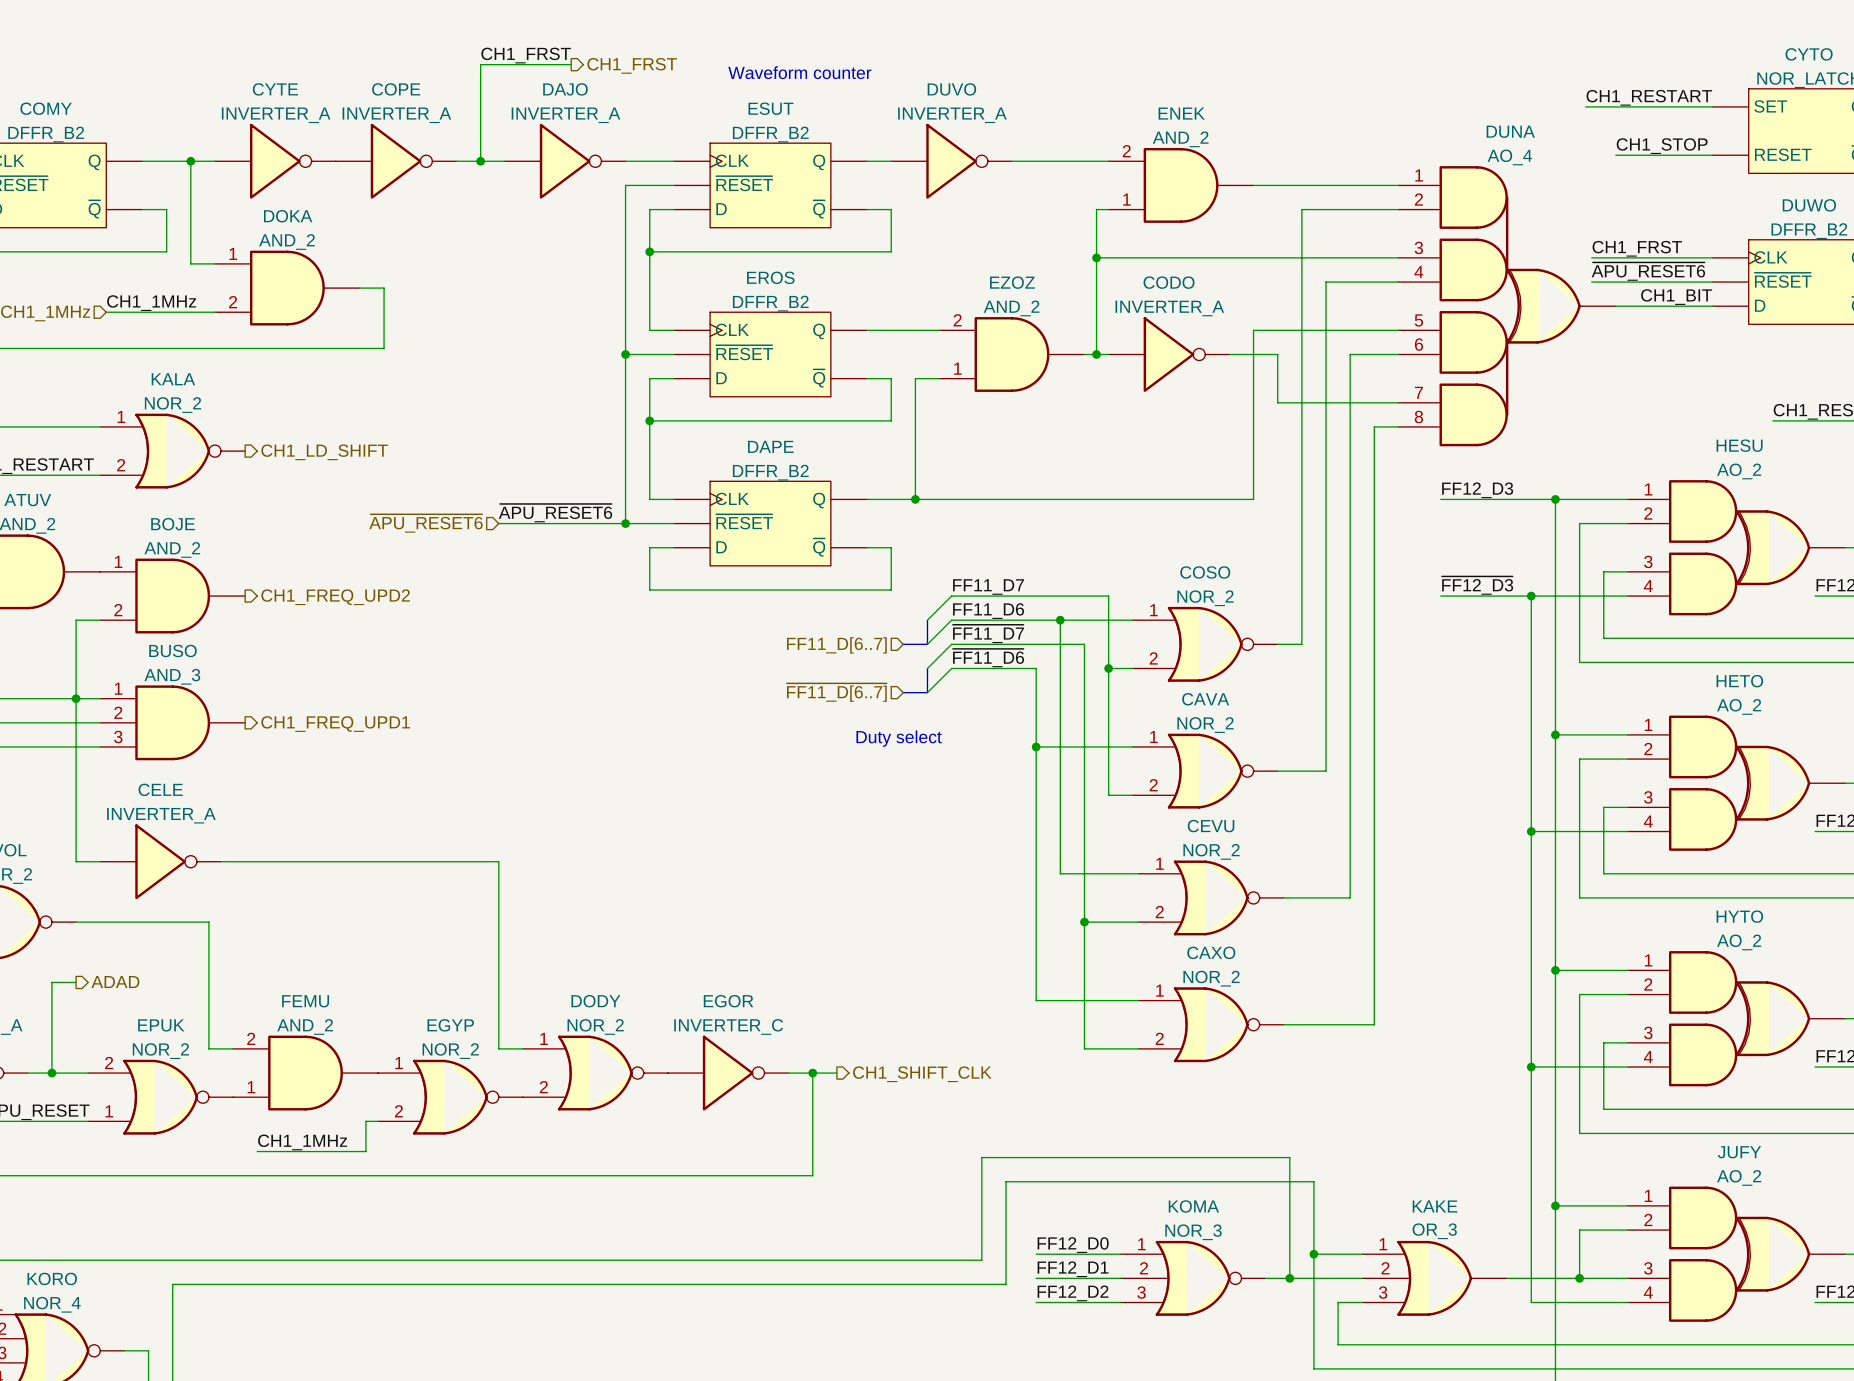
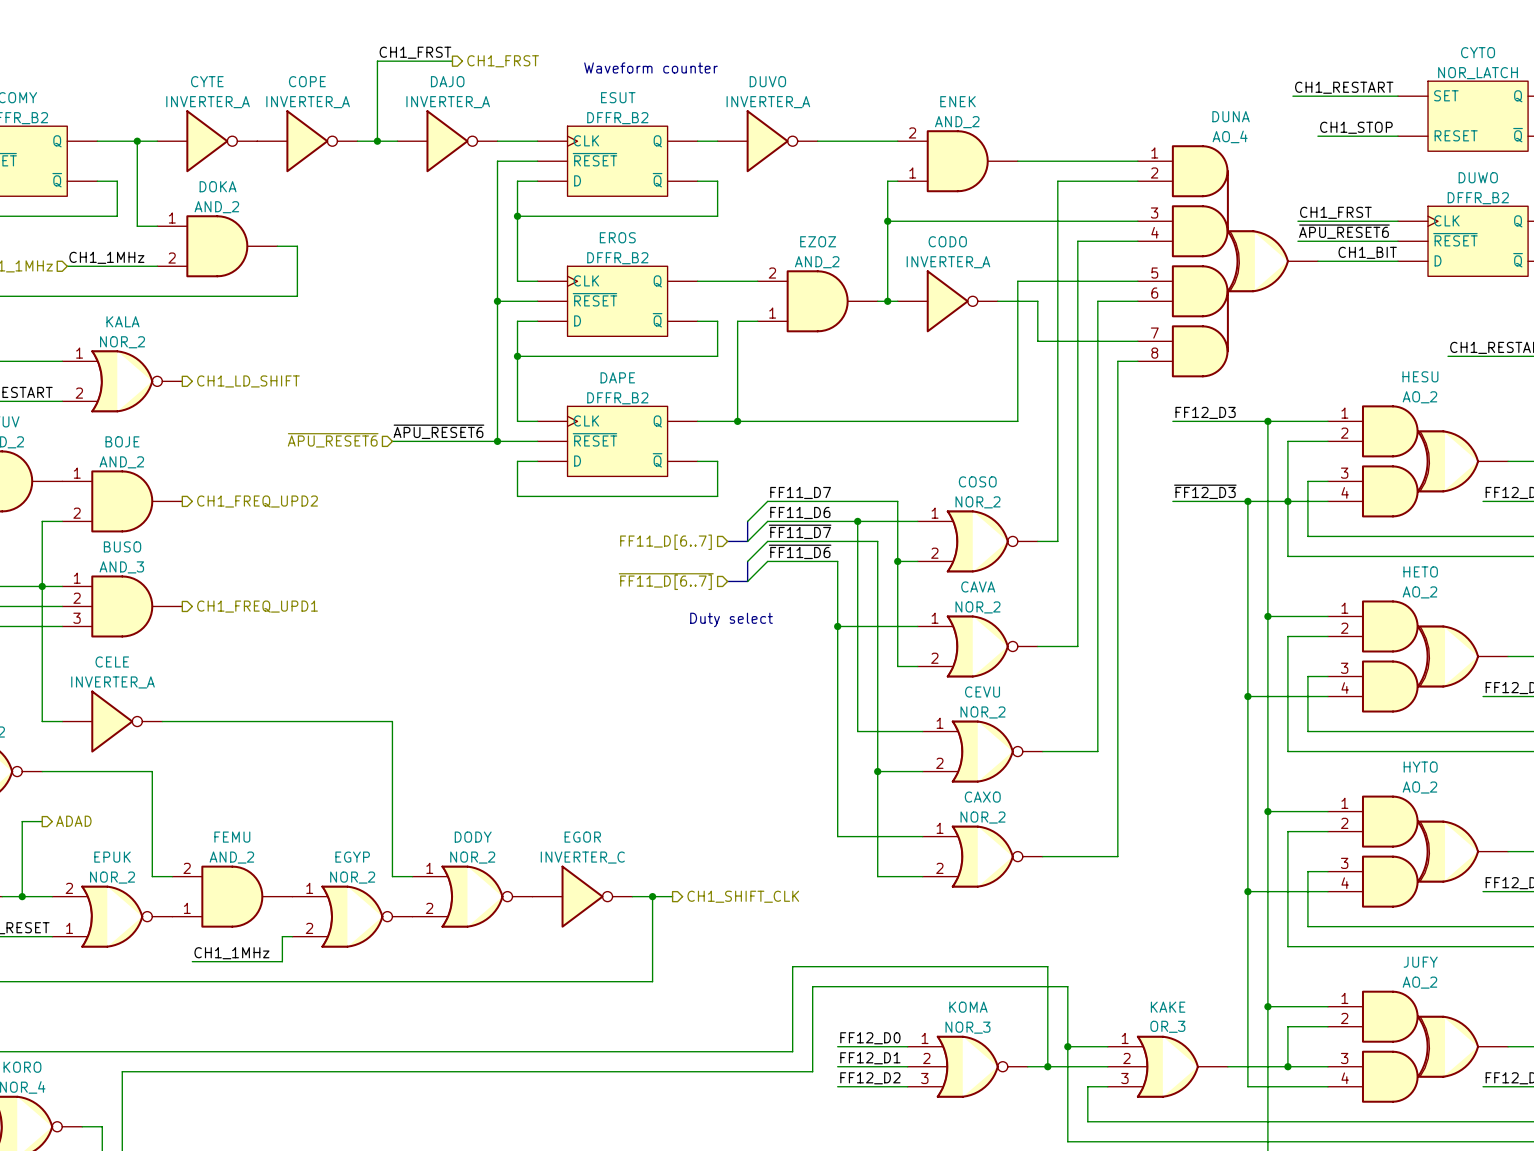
junction: none -> (1287, 501)

